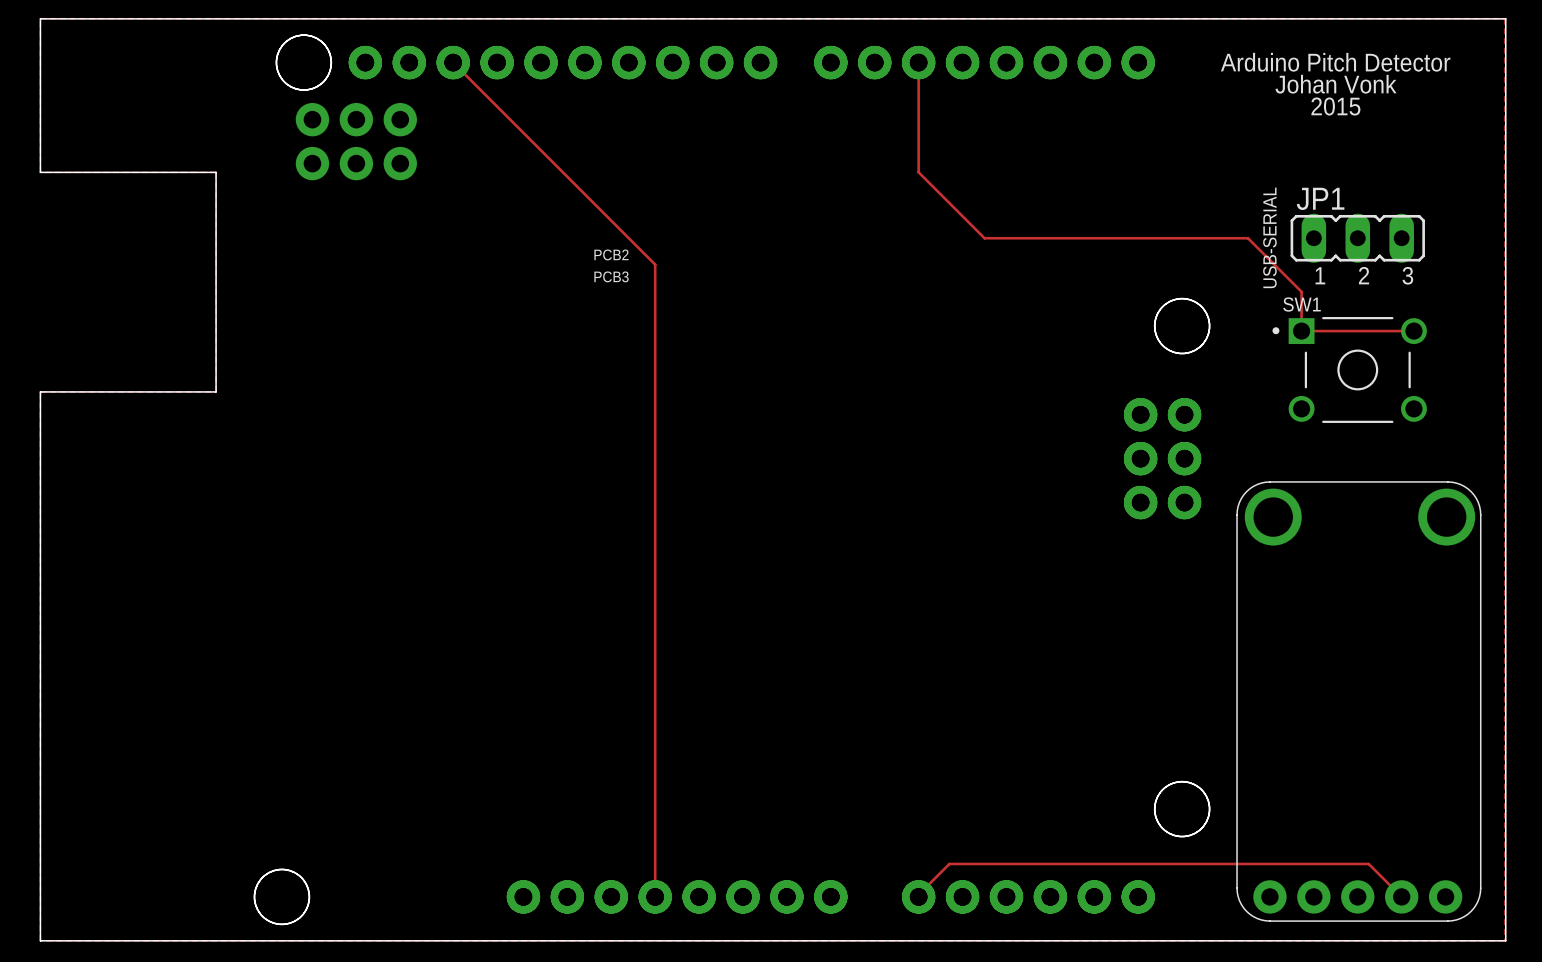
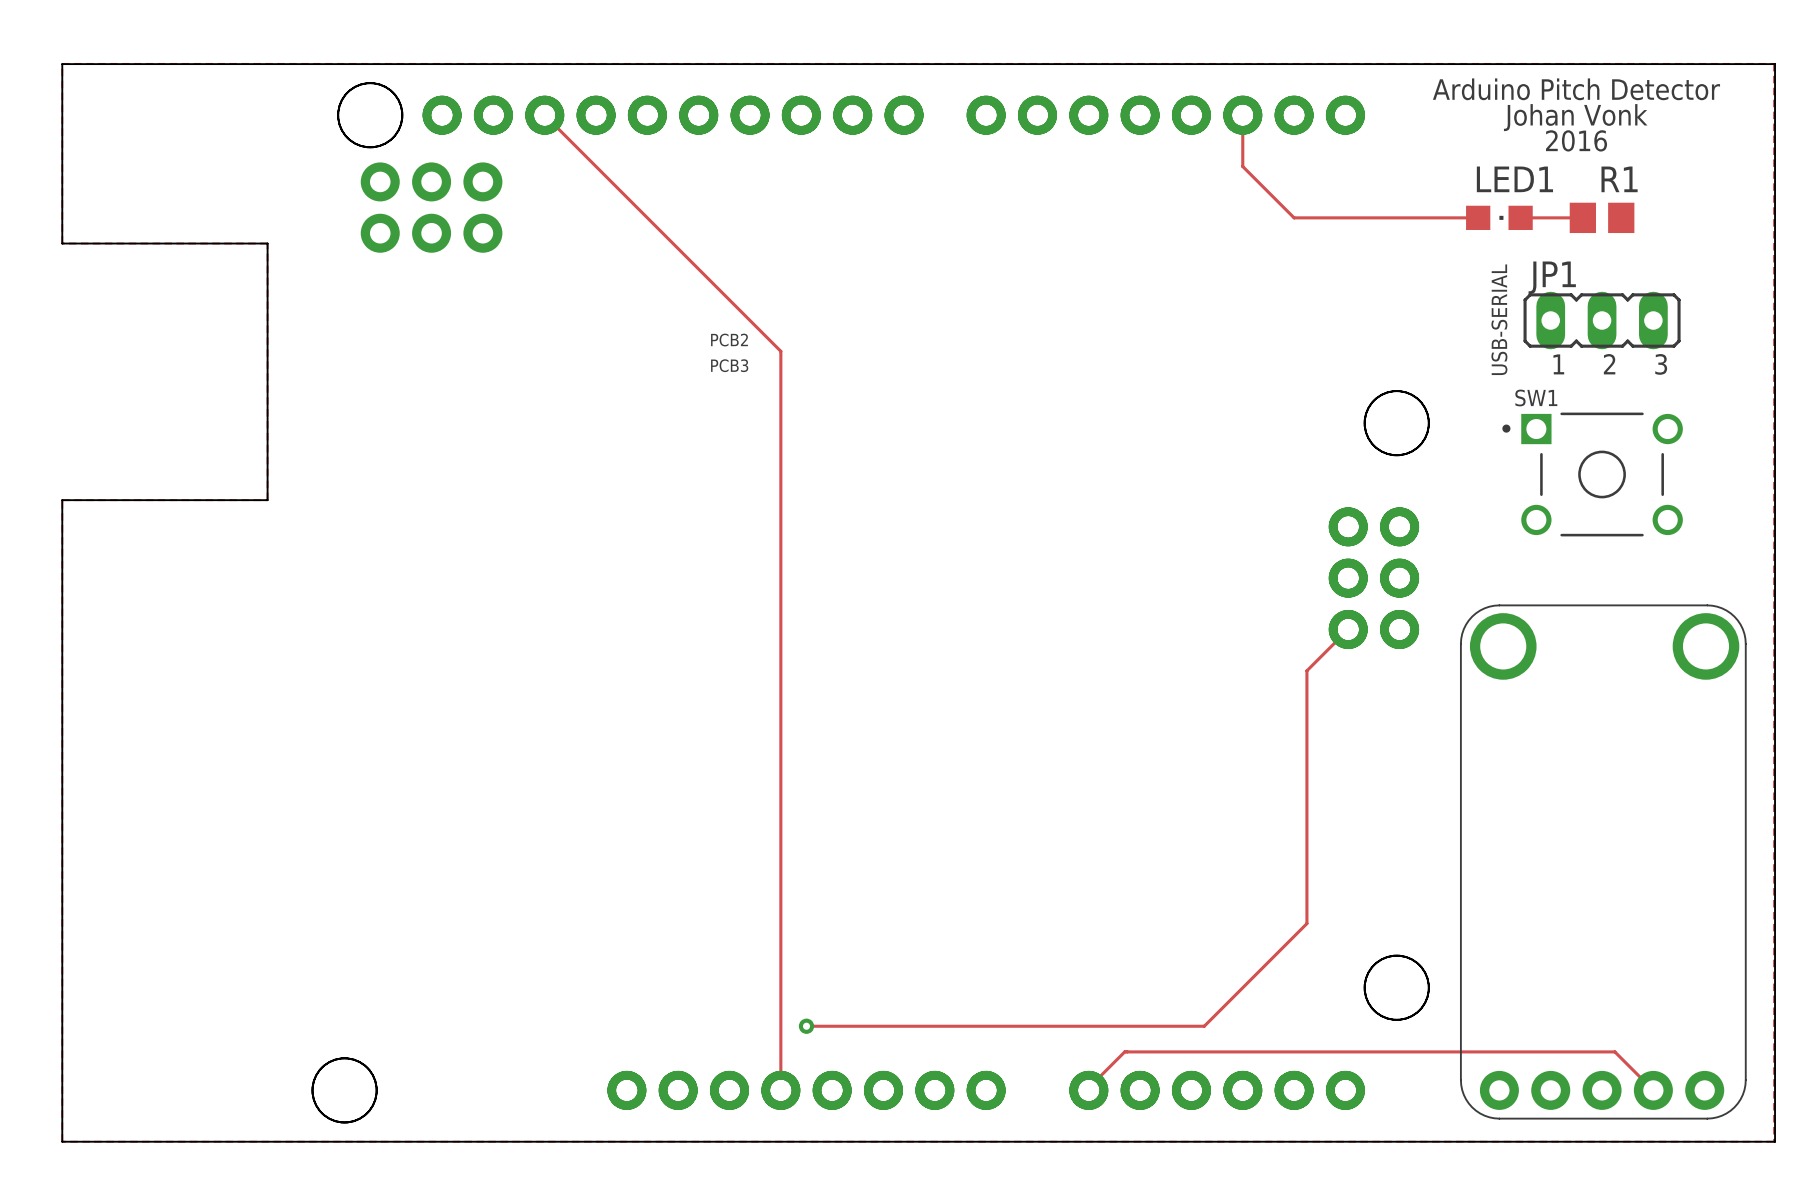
text: none -> Arduino Pitch Detector (1576, 89)
track: (918, 62) (918, 172) (984, 238) (1247, 238) (1301, 291) (1301, 331) (1413, 331) -> none
track: none -> (1242, 115) (1242, 166) (1294, 217) (1478, 217)
text: Arduino Pitch Detector (1335, 62) -> Johan Vonk (1575, 117)
text: Johan Vonk (1336, 84) -> 2016 (1576, 140)
text: 2015 (1335, 106) -> none
LED1: none -> (1499, 217)
track: none -> (1520, 217) (1582, 217)
R1: none -> (1602, 217)
track: none -> (1348, 629) (1306, 670) (1306, 923) (1204, 1026) (806, 1026)
via: none -> (806, 1026)

